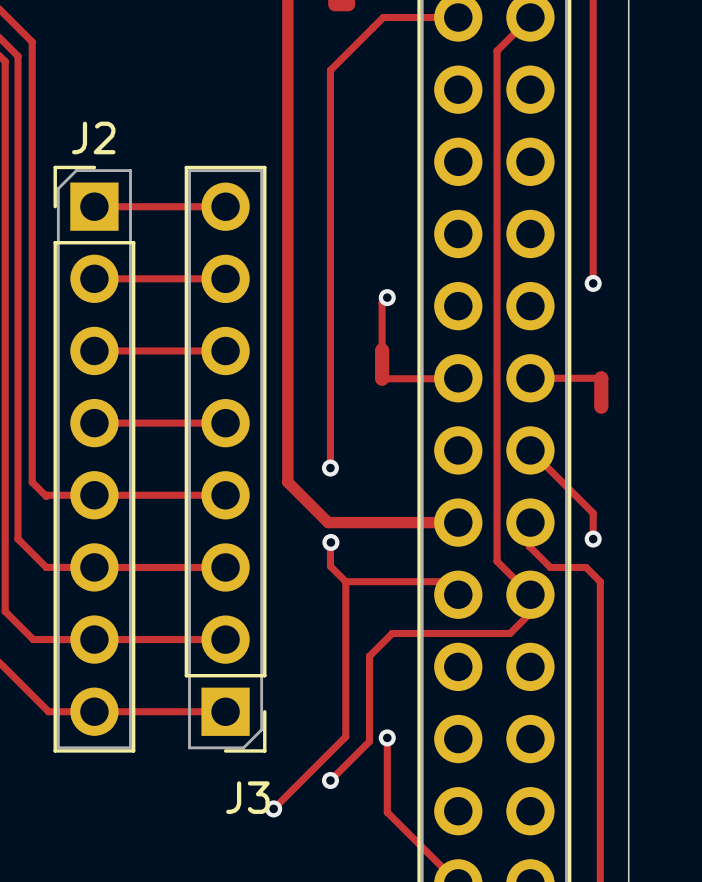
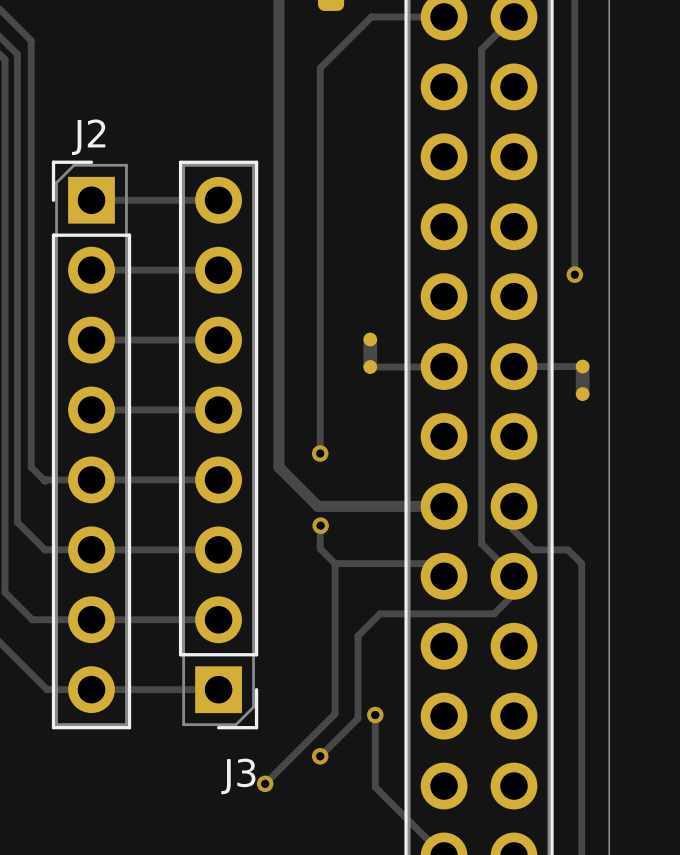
track: (387, 297) (382, 302) (382, 350) -> none
via: (387, 297) -> none
track: (530, 450) (593, 513) (593, 539) -> none
via: (593, 539) -> none

